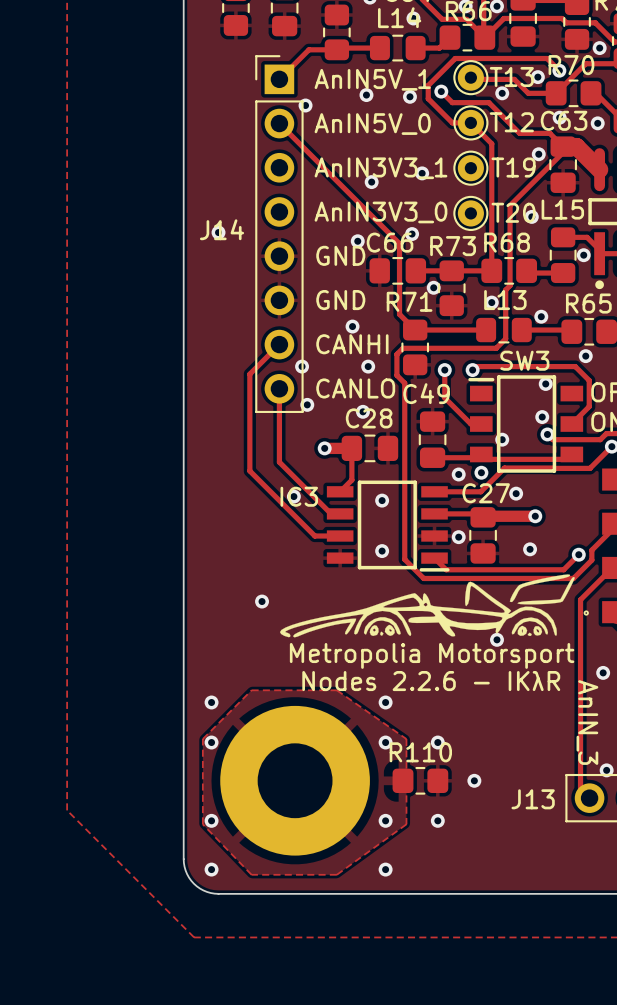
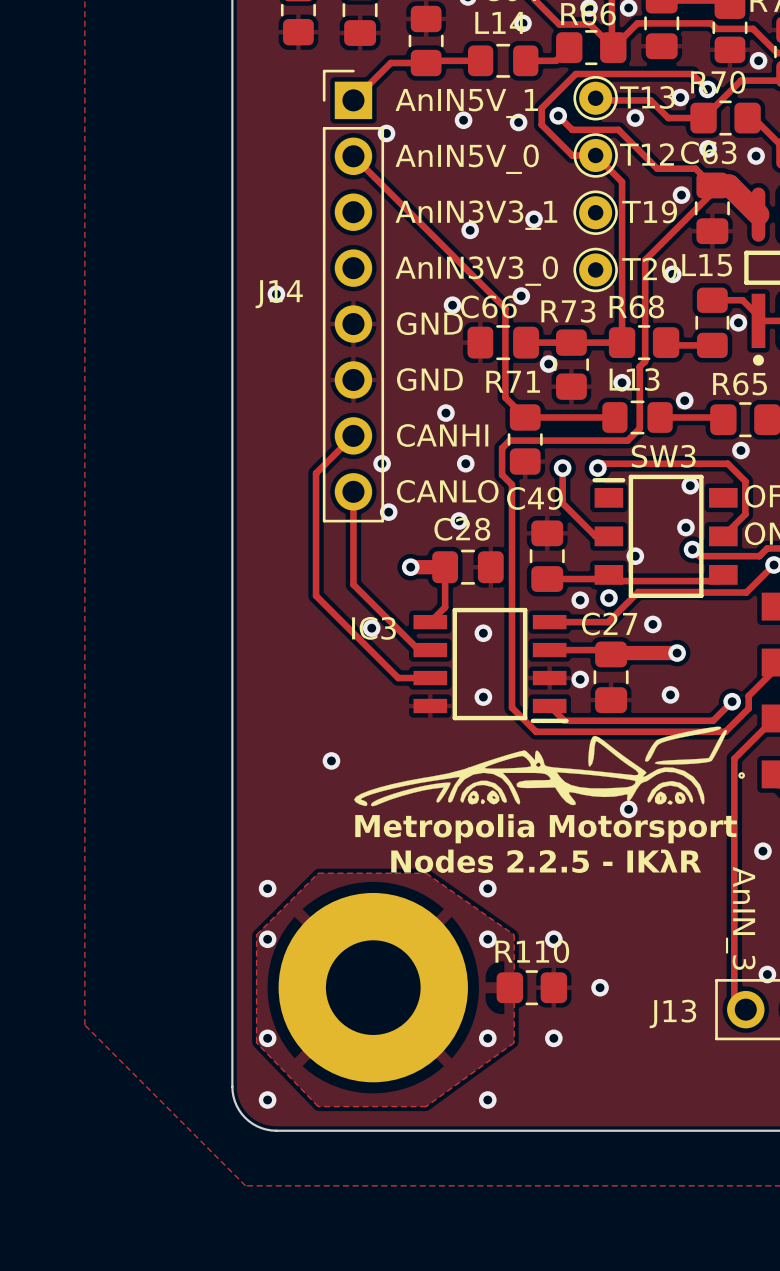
text: Nodes 2.2.6 - IKλR (431, 681) -> Nodes 2.2.5 - IKλR (546, 861)

